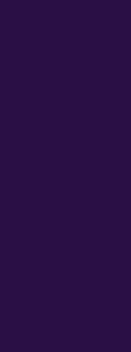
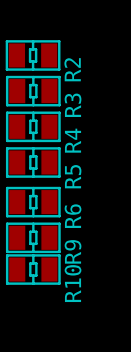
R2: none -> (33, 55)
R3: none -> (33, 91)
R4: none -> (33, 126)
R5: none -> (33, 162)
R6: none -> (33, 202)
R9: none -> (33, 237)
R10: none -> (33, 269)

